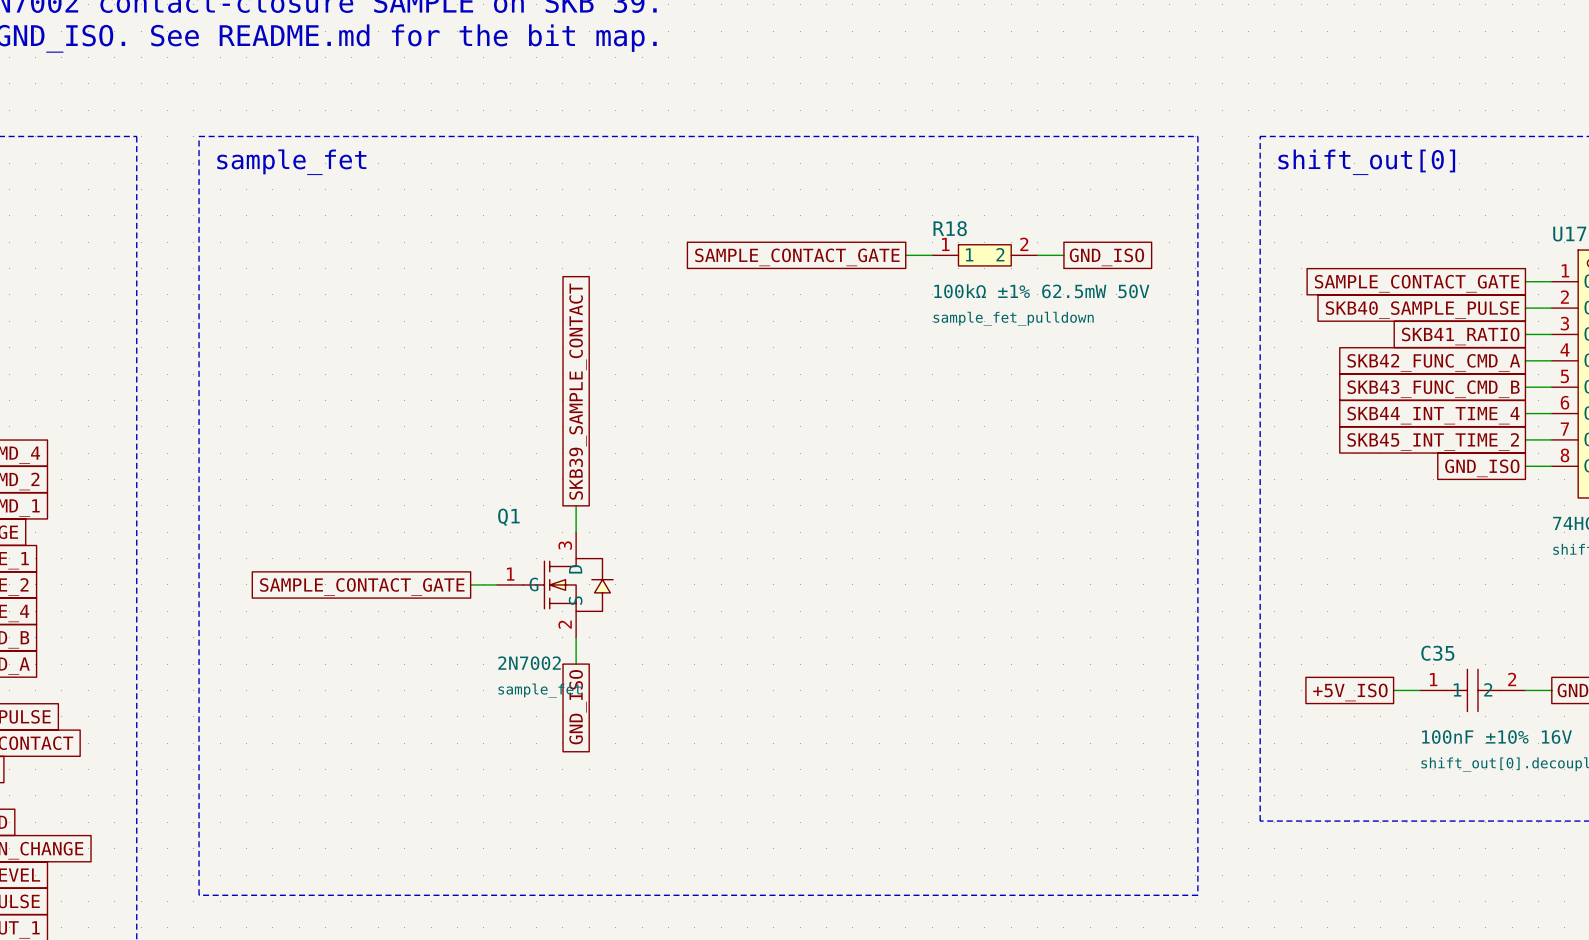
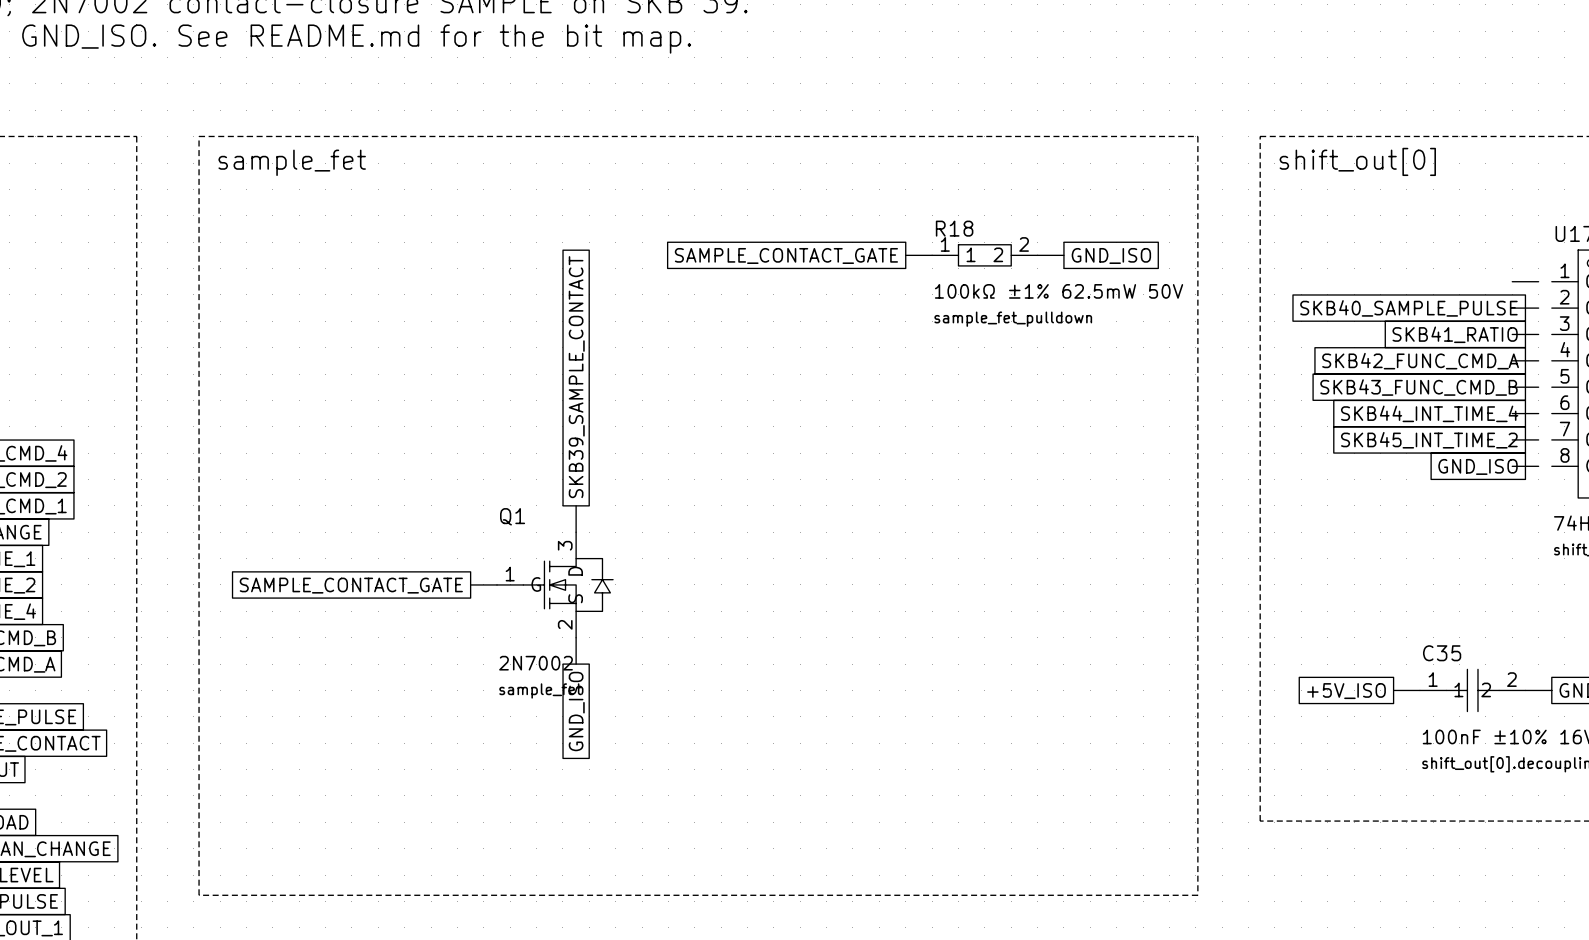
wire: (1538, 281) (1551, 281) -> (1512, 281) (1525, 281)
global label: SAMPLE_CONTACT_GATE (1417, 283) -> none
wire: (1538, 308) (1551, 308) -> (1512, 308) (1525, 308)
wire: (1538, 334) (1551, 334) -> (1512, 334) (1525, 334)
wire: (1538, 360) (1551, 360) -> (1512, 360) (1525, 360)
wire: (1538, 387) (1551, 387) -> (1512, 387) (1525, 387)
wire: (1538, 413) (1551, 413) -> (1512, 413) (1525, 413)
wire: (1538, 439) (1551, 439) -> (1512, 439) (1525, 439)
wire: (1538, 466) (1551, 466) -> (1512, 466) (1525, 466)

